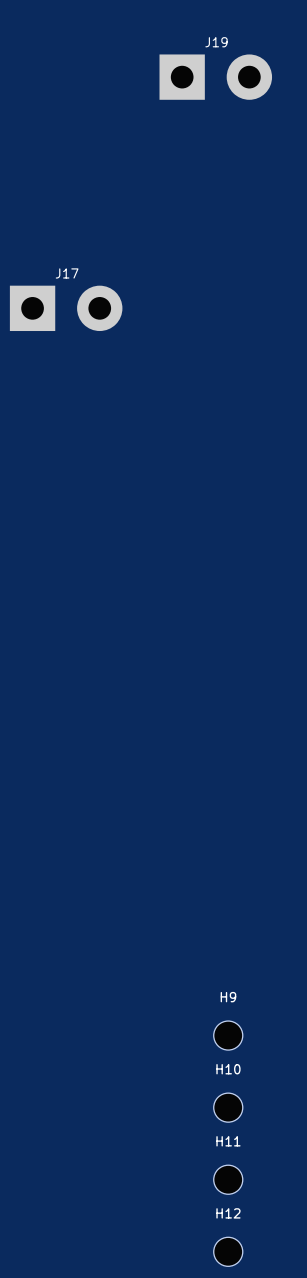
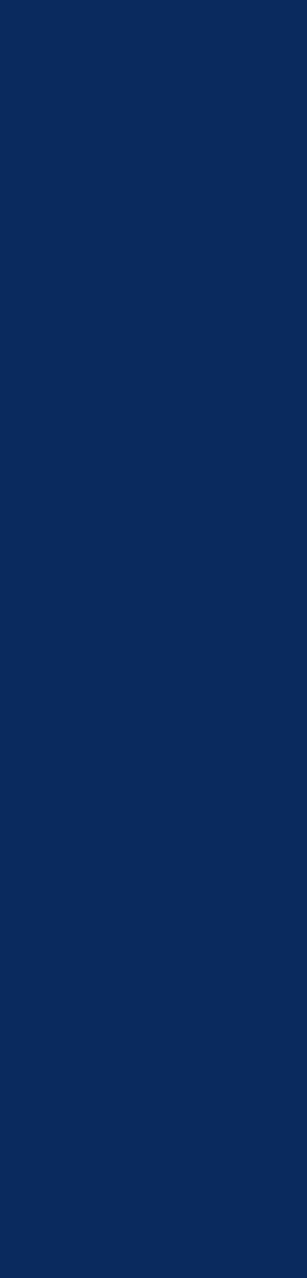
J19: (215, 77) -> none
J17: (66, 308) -> none
H9: (228, 1035) -> none
H10: (228, 1107) -> none
H11: (228, 1179) -> none
H12: (228, 1251) -> none

